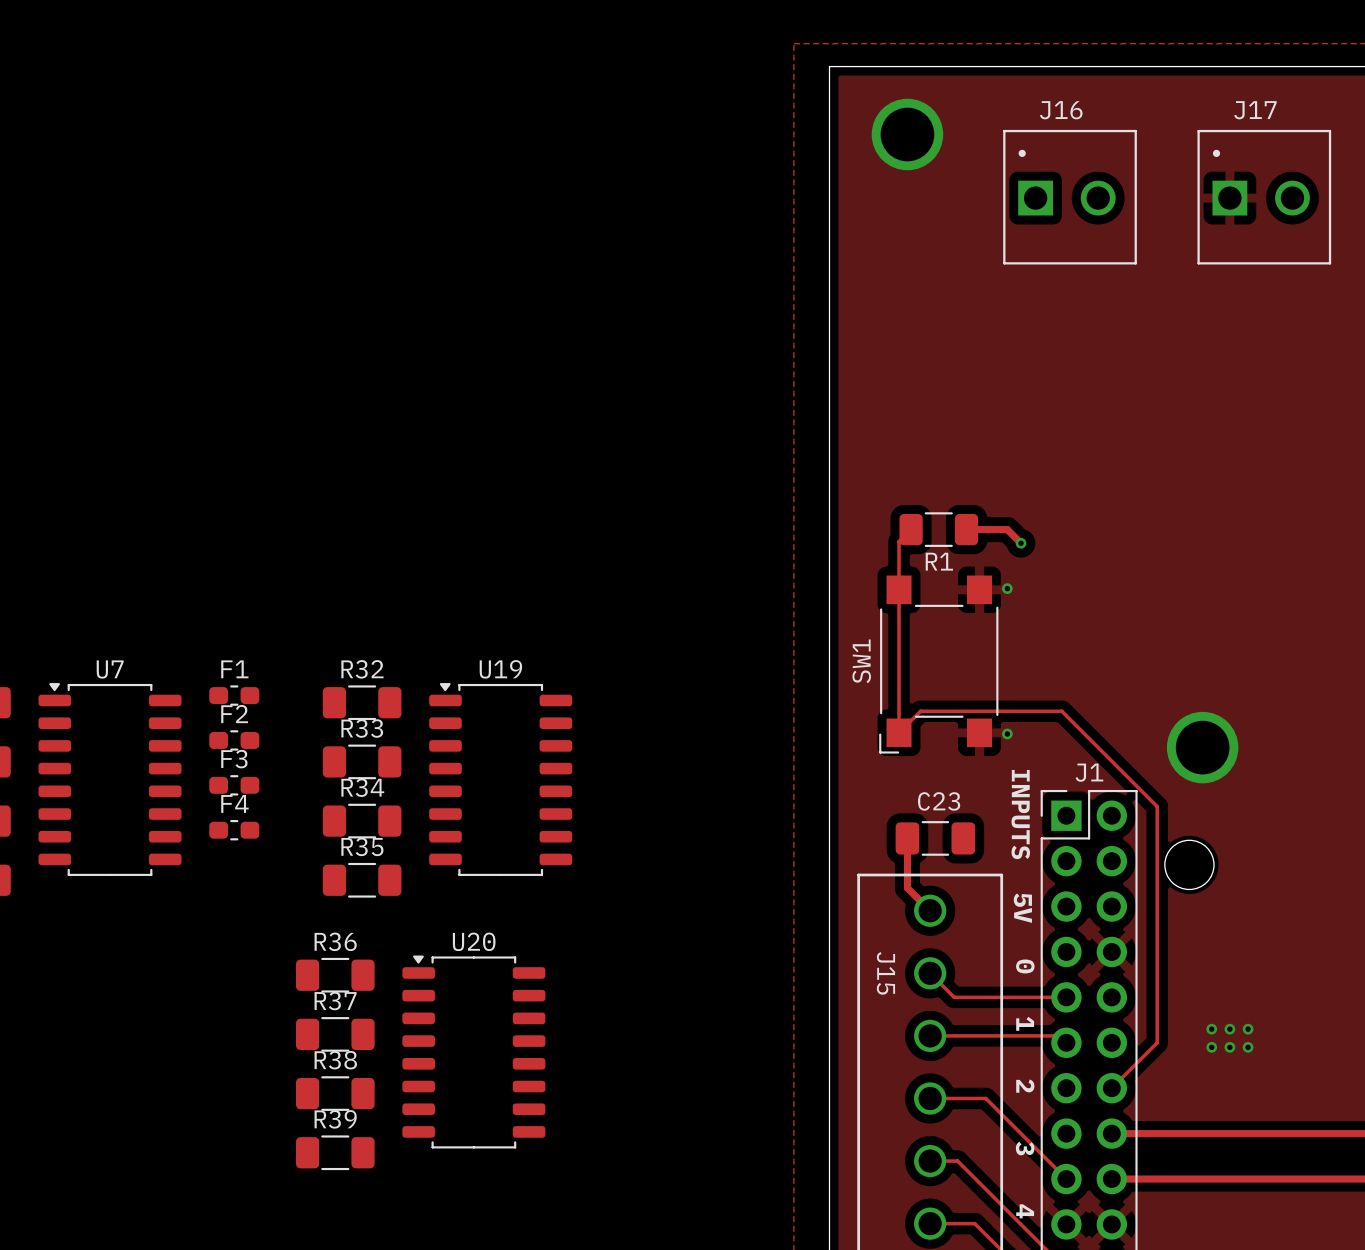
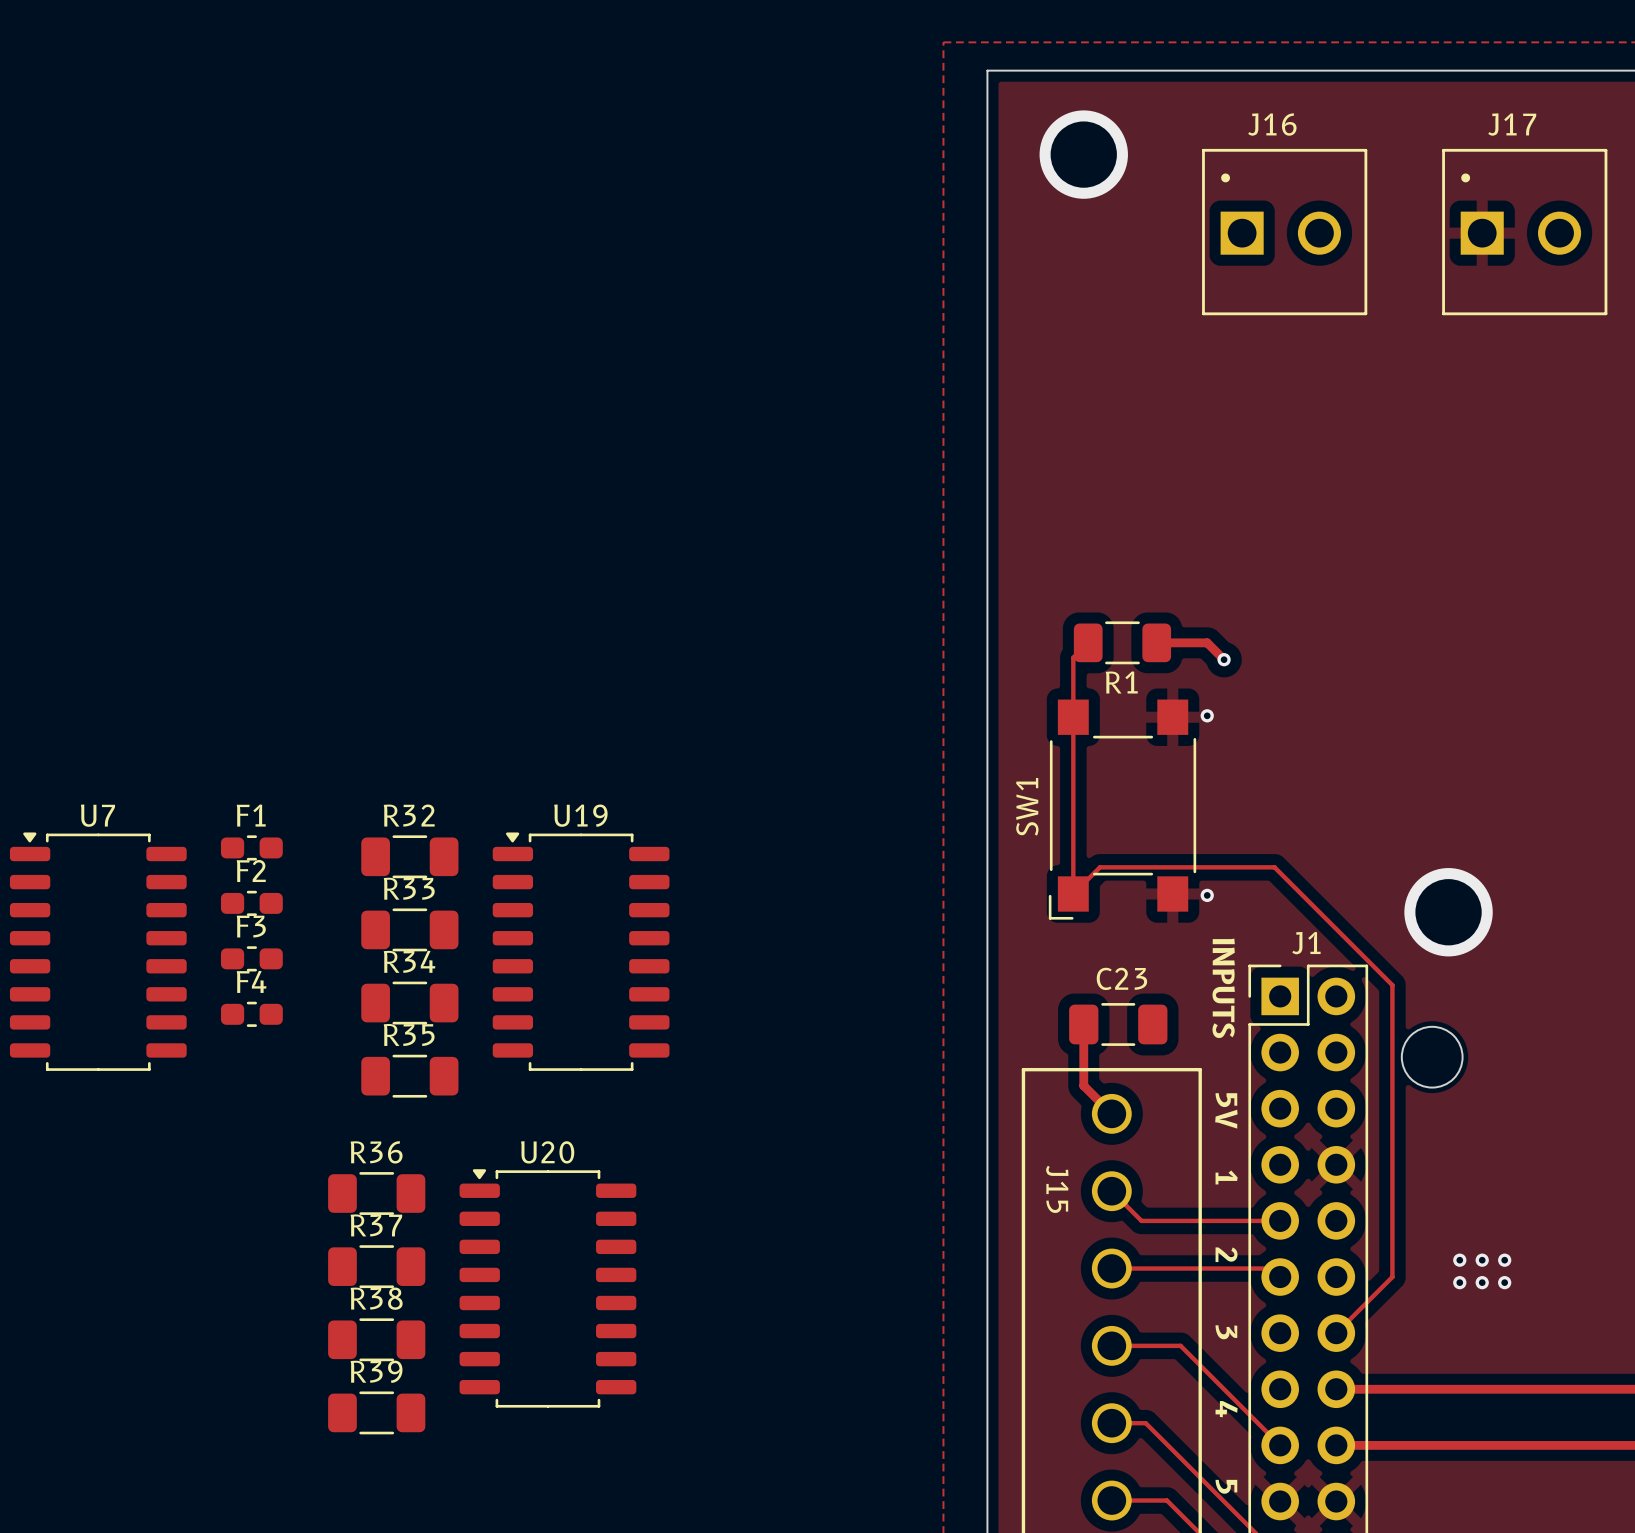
text: 0 (1025, 966) -> 1 (1226, 1177)
text: 1 (1025, 1023) -> 2 (1226, 1254)
text: 2 (1025, 1086) -> 3 (1226, 1332)
text: 3 (1025, 1148) -> 4 (1226, 1409)
text: 4 (1025, 1211) -> 5 (1226, 1486)

